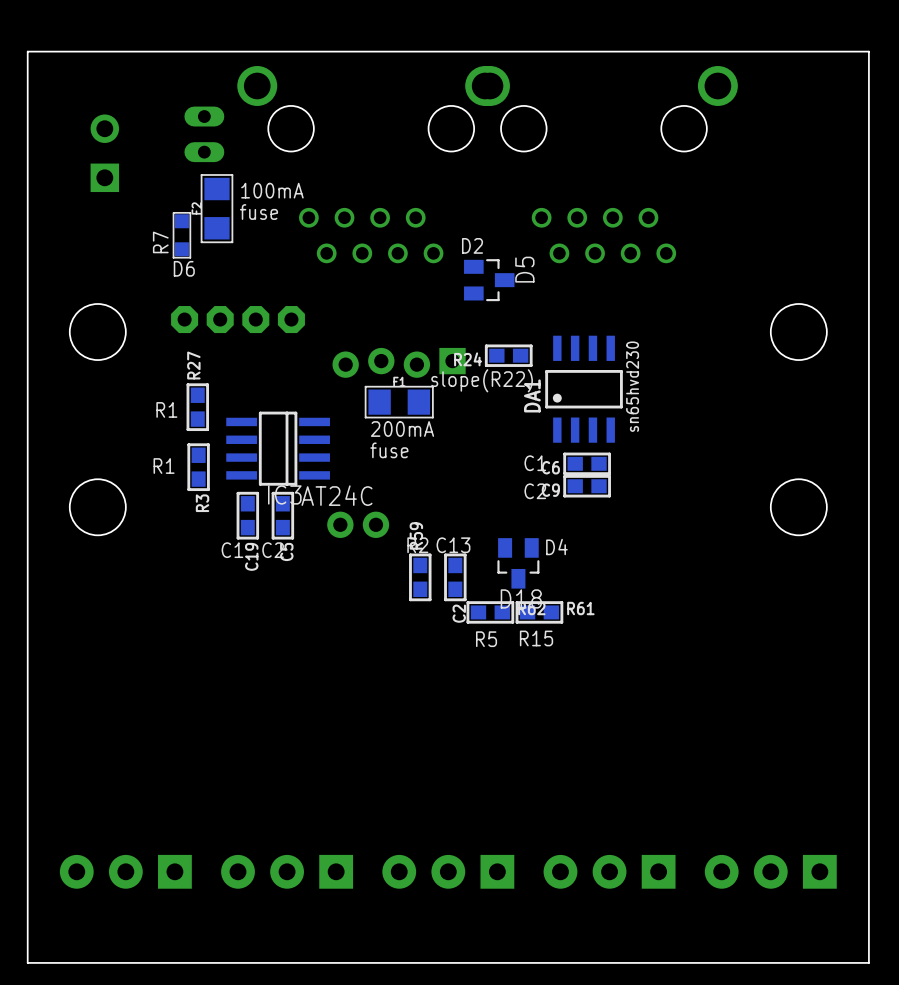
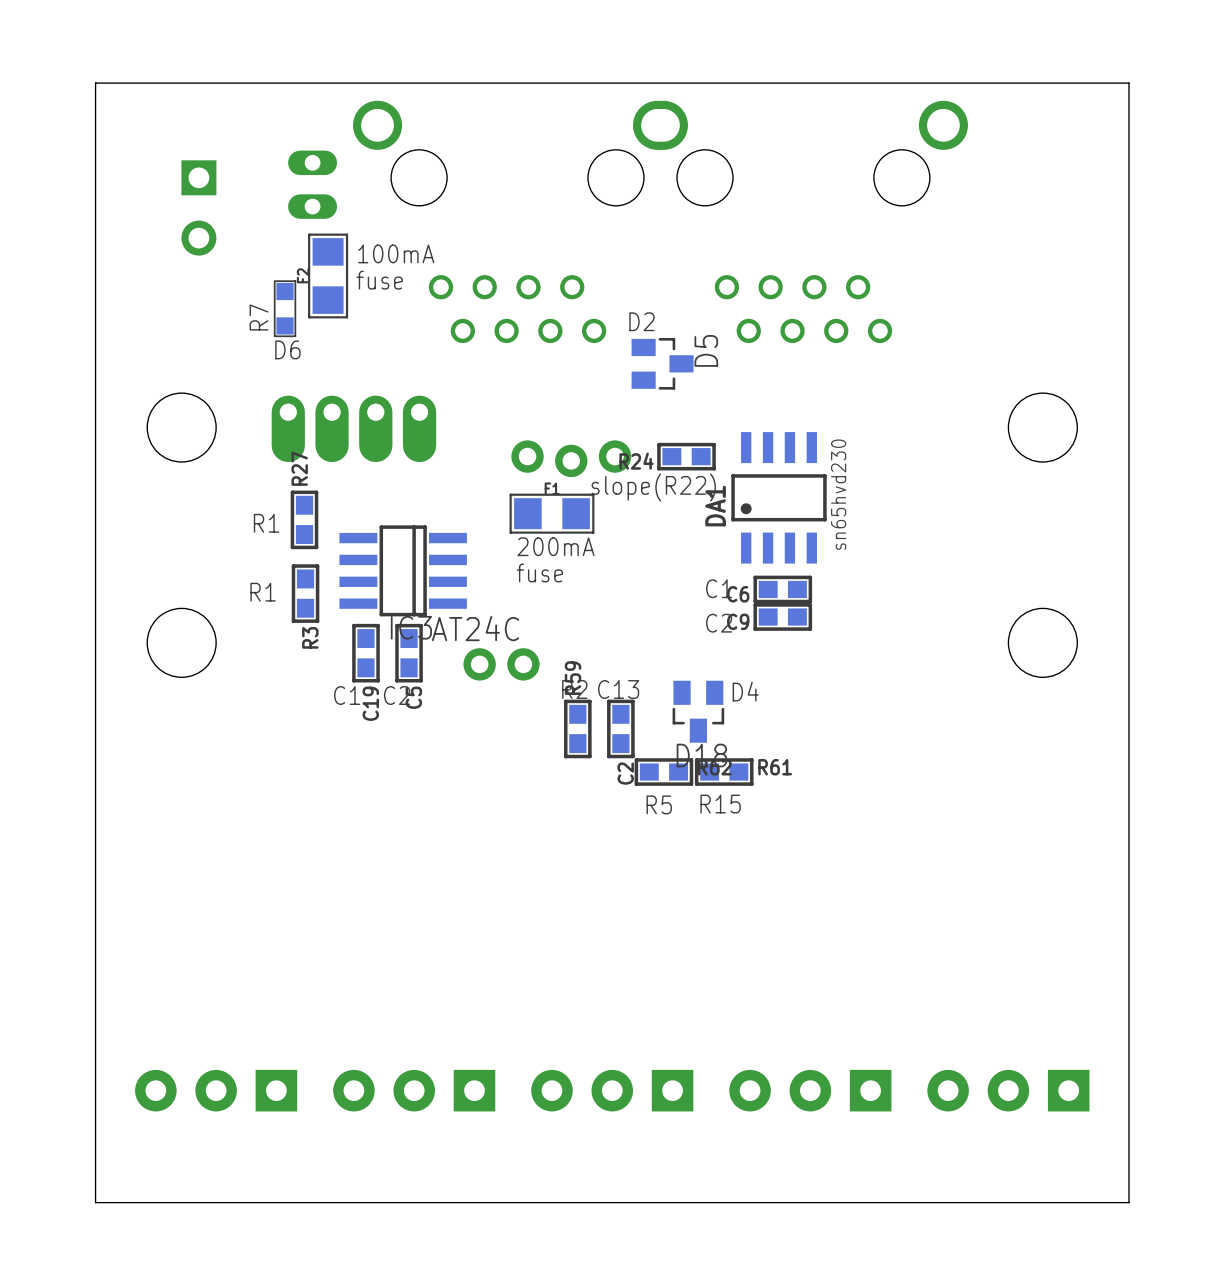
part rotation: 0° (104, 153) -> 180° (198, 207)
part footprint: [171, 306, 305, 334] -> [271, 395, 437, 463]
part: none -> (571, 458)
part: (399, 362) -> none

